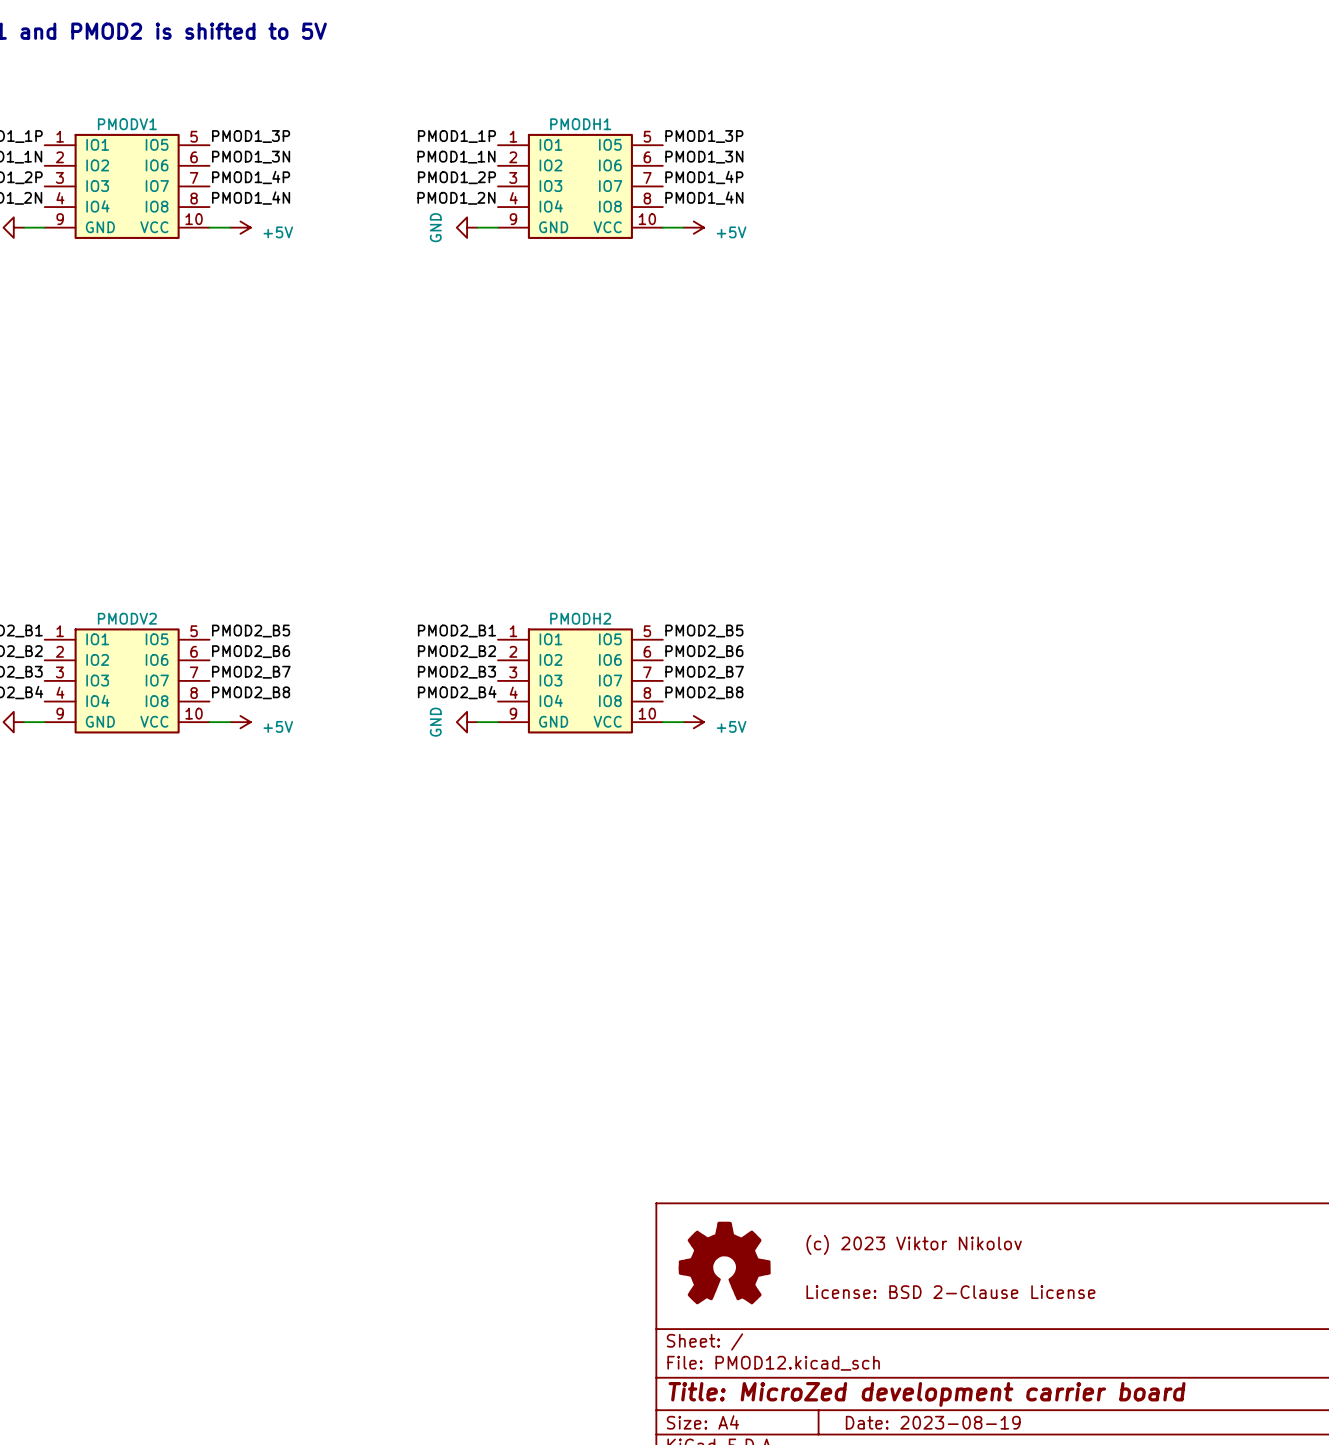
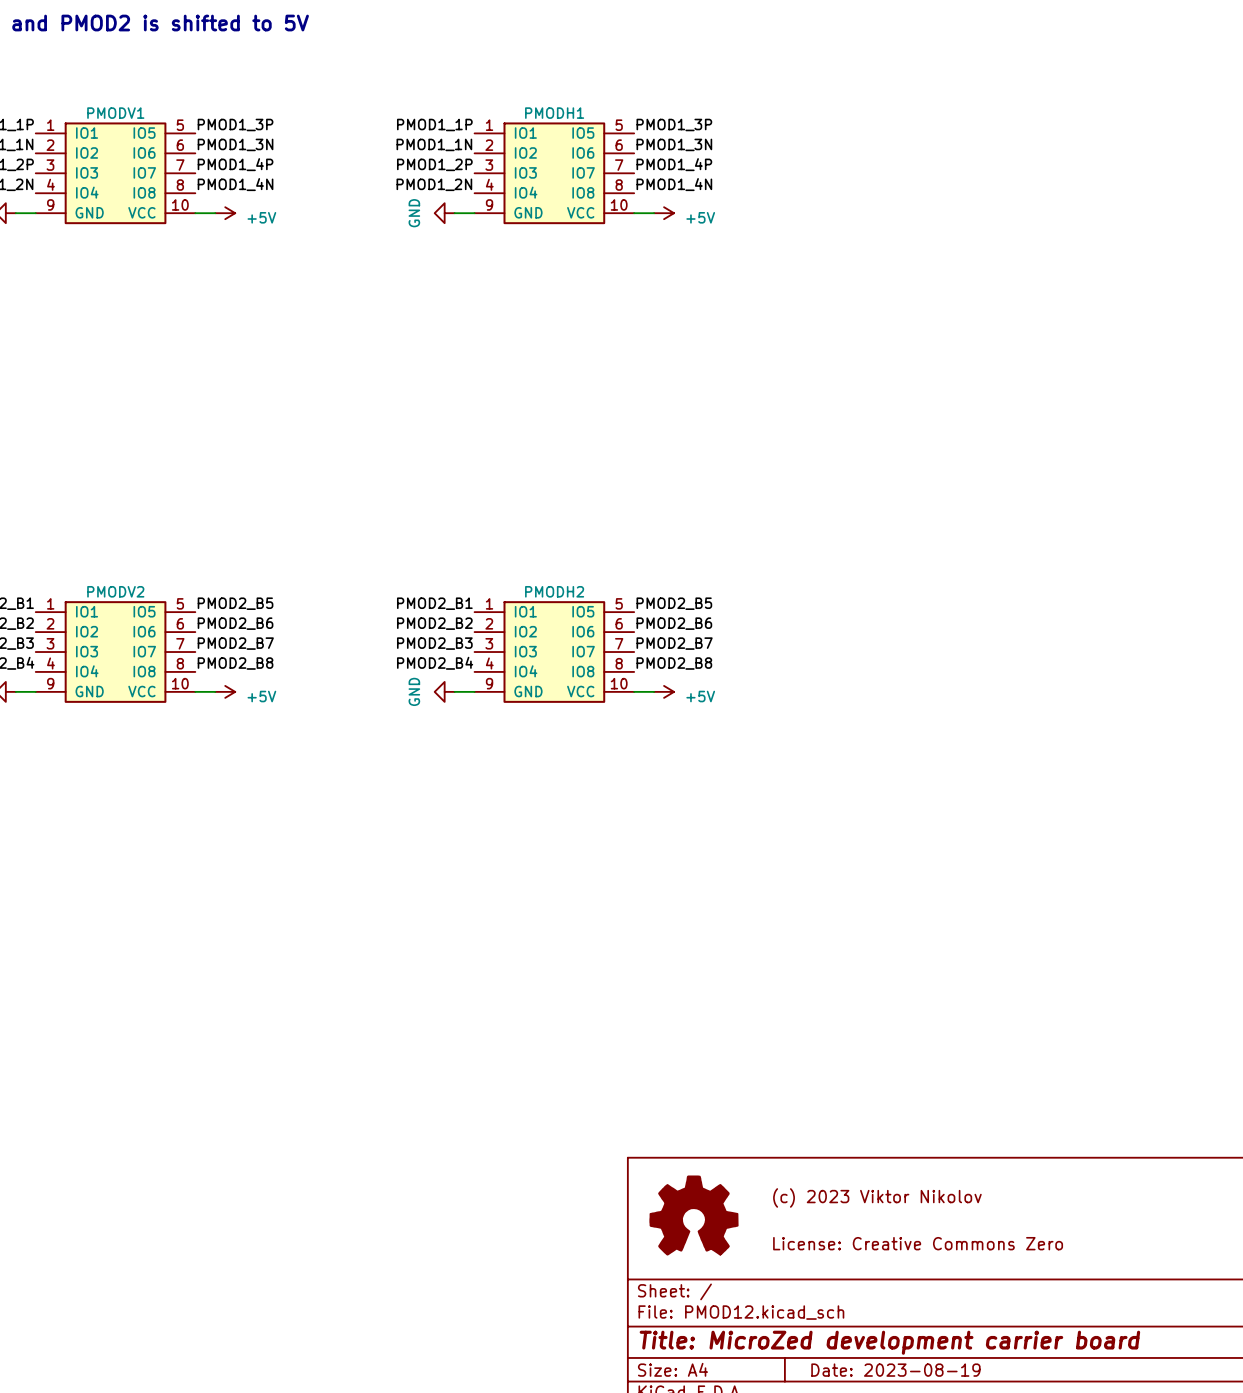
title block: License: BSD 2-Clause License (950, 1292) -> License: Creative Commons Zero (918, 1243)

